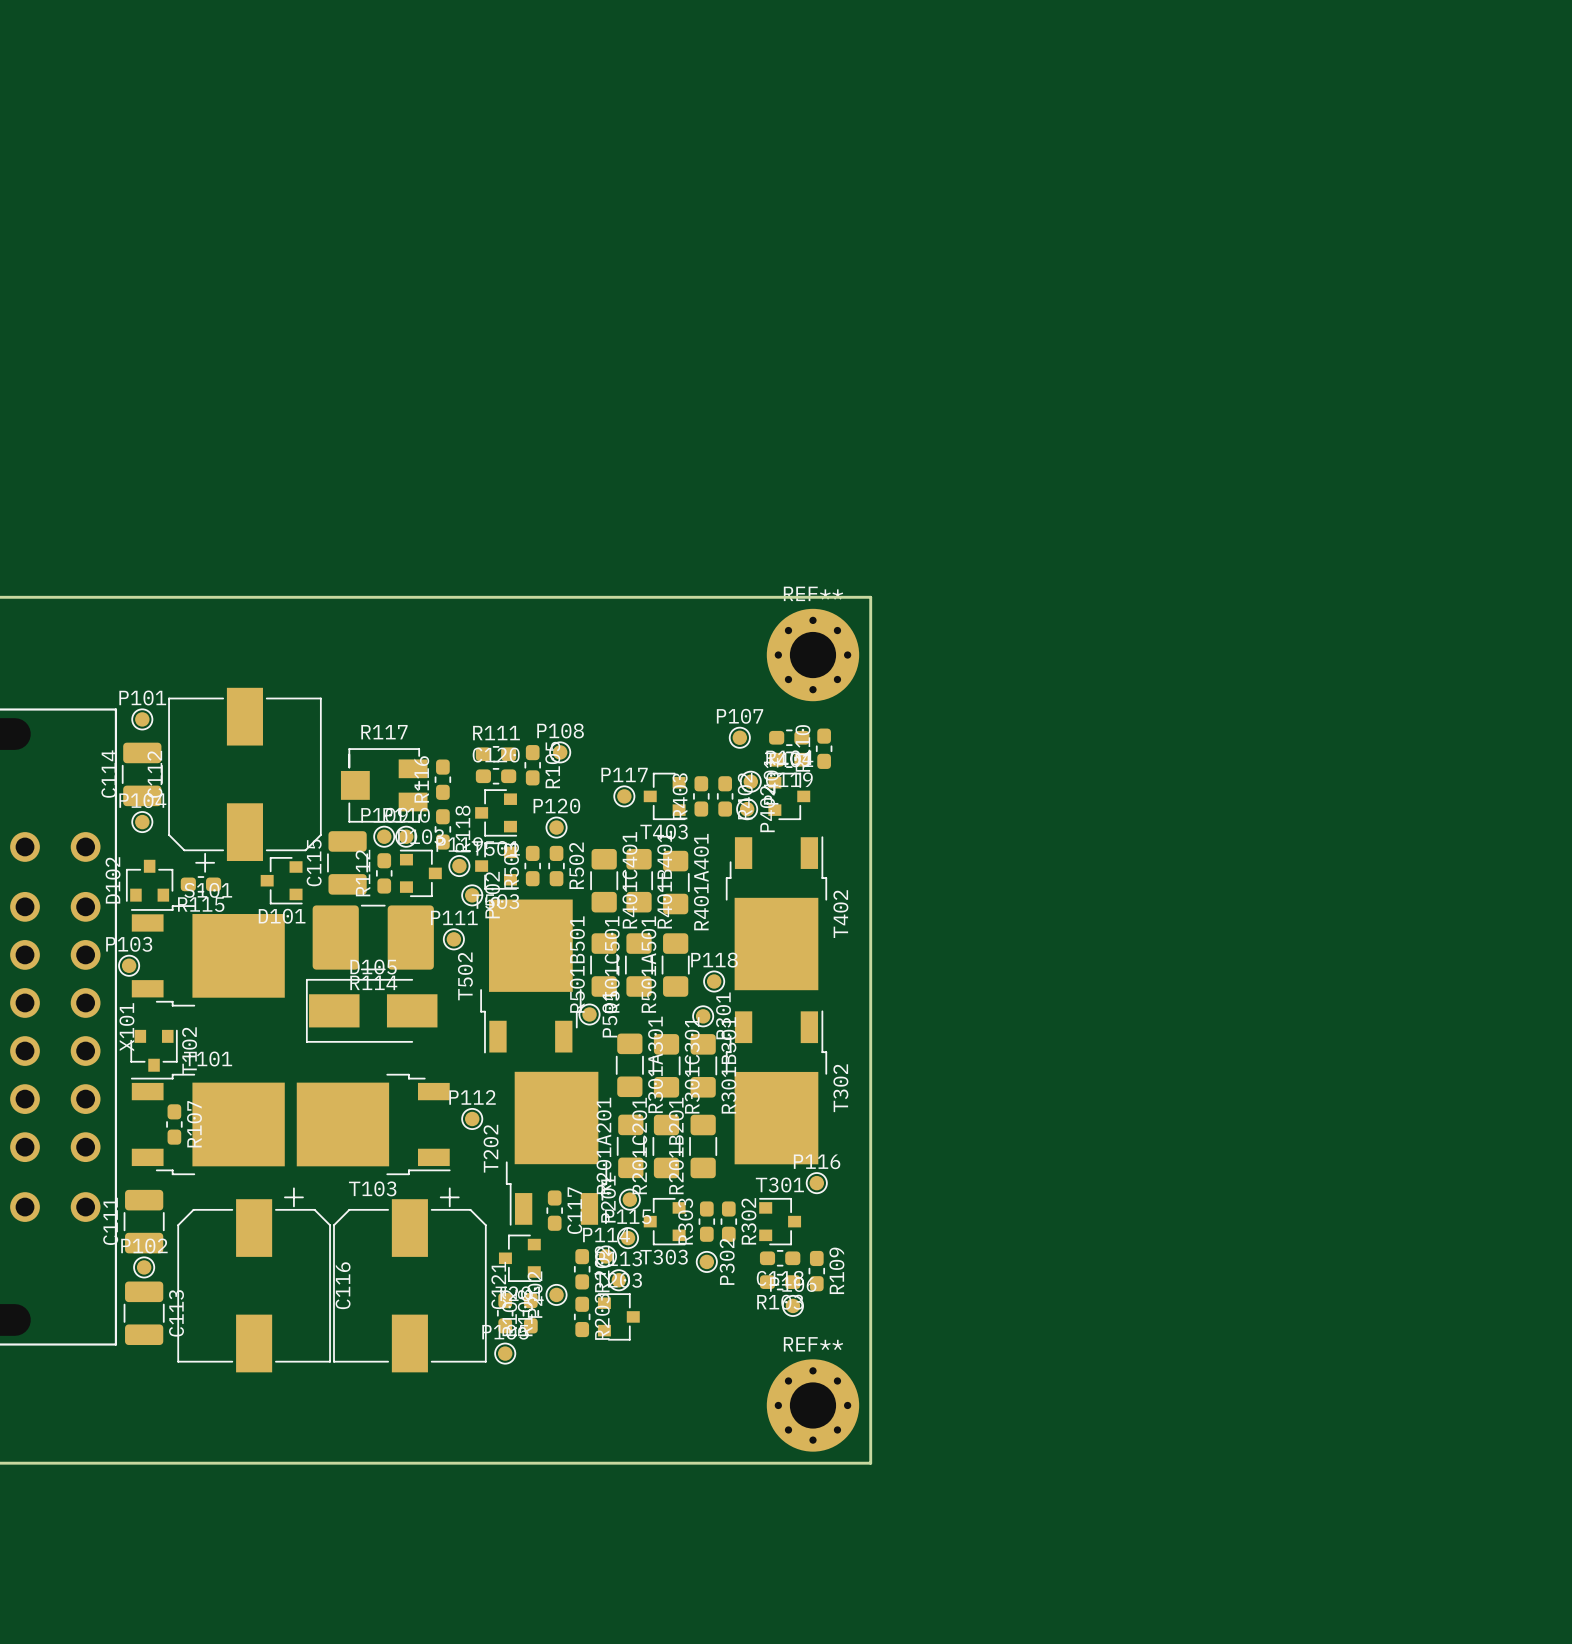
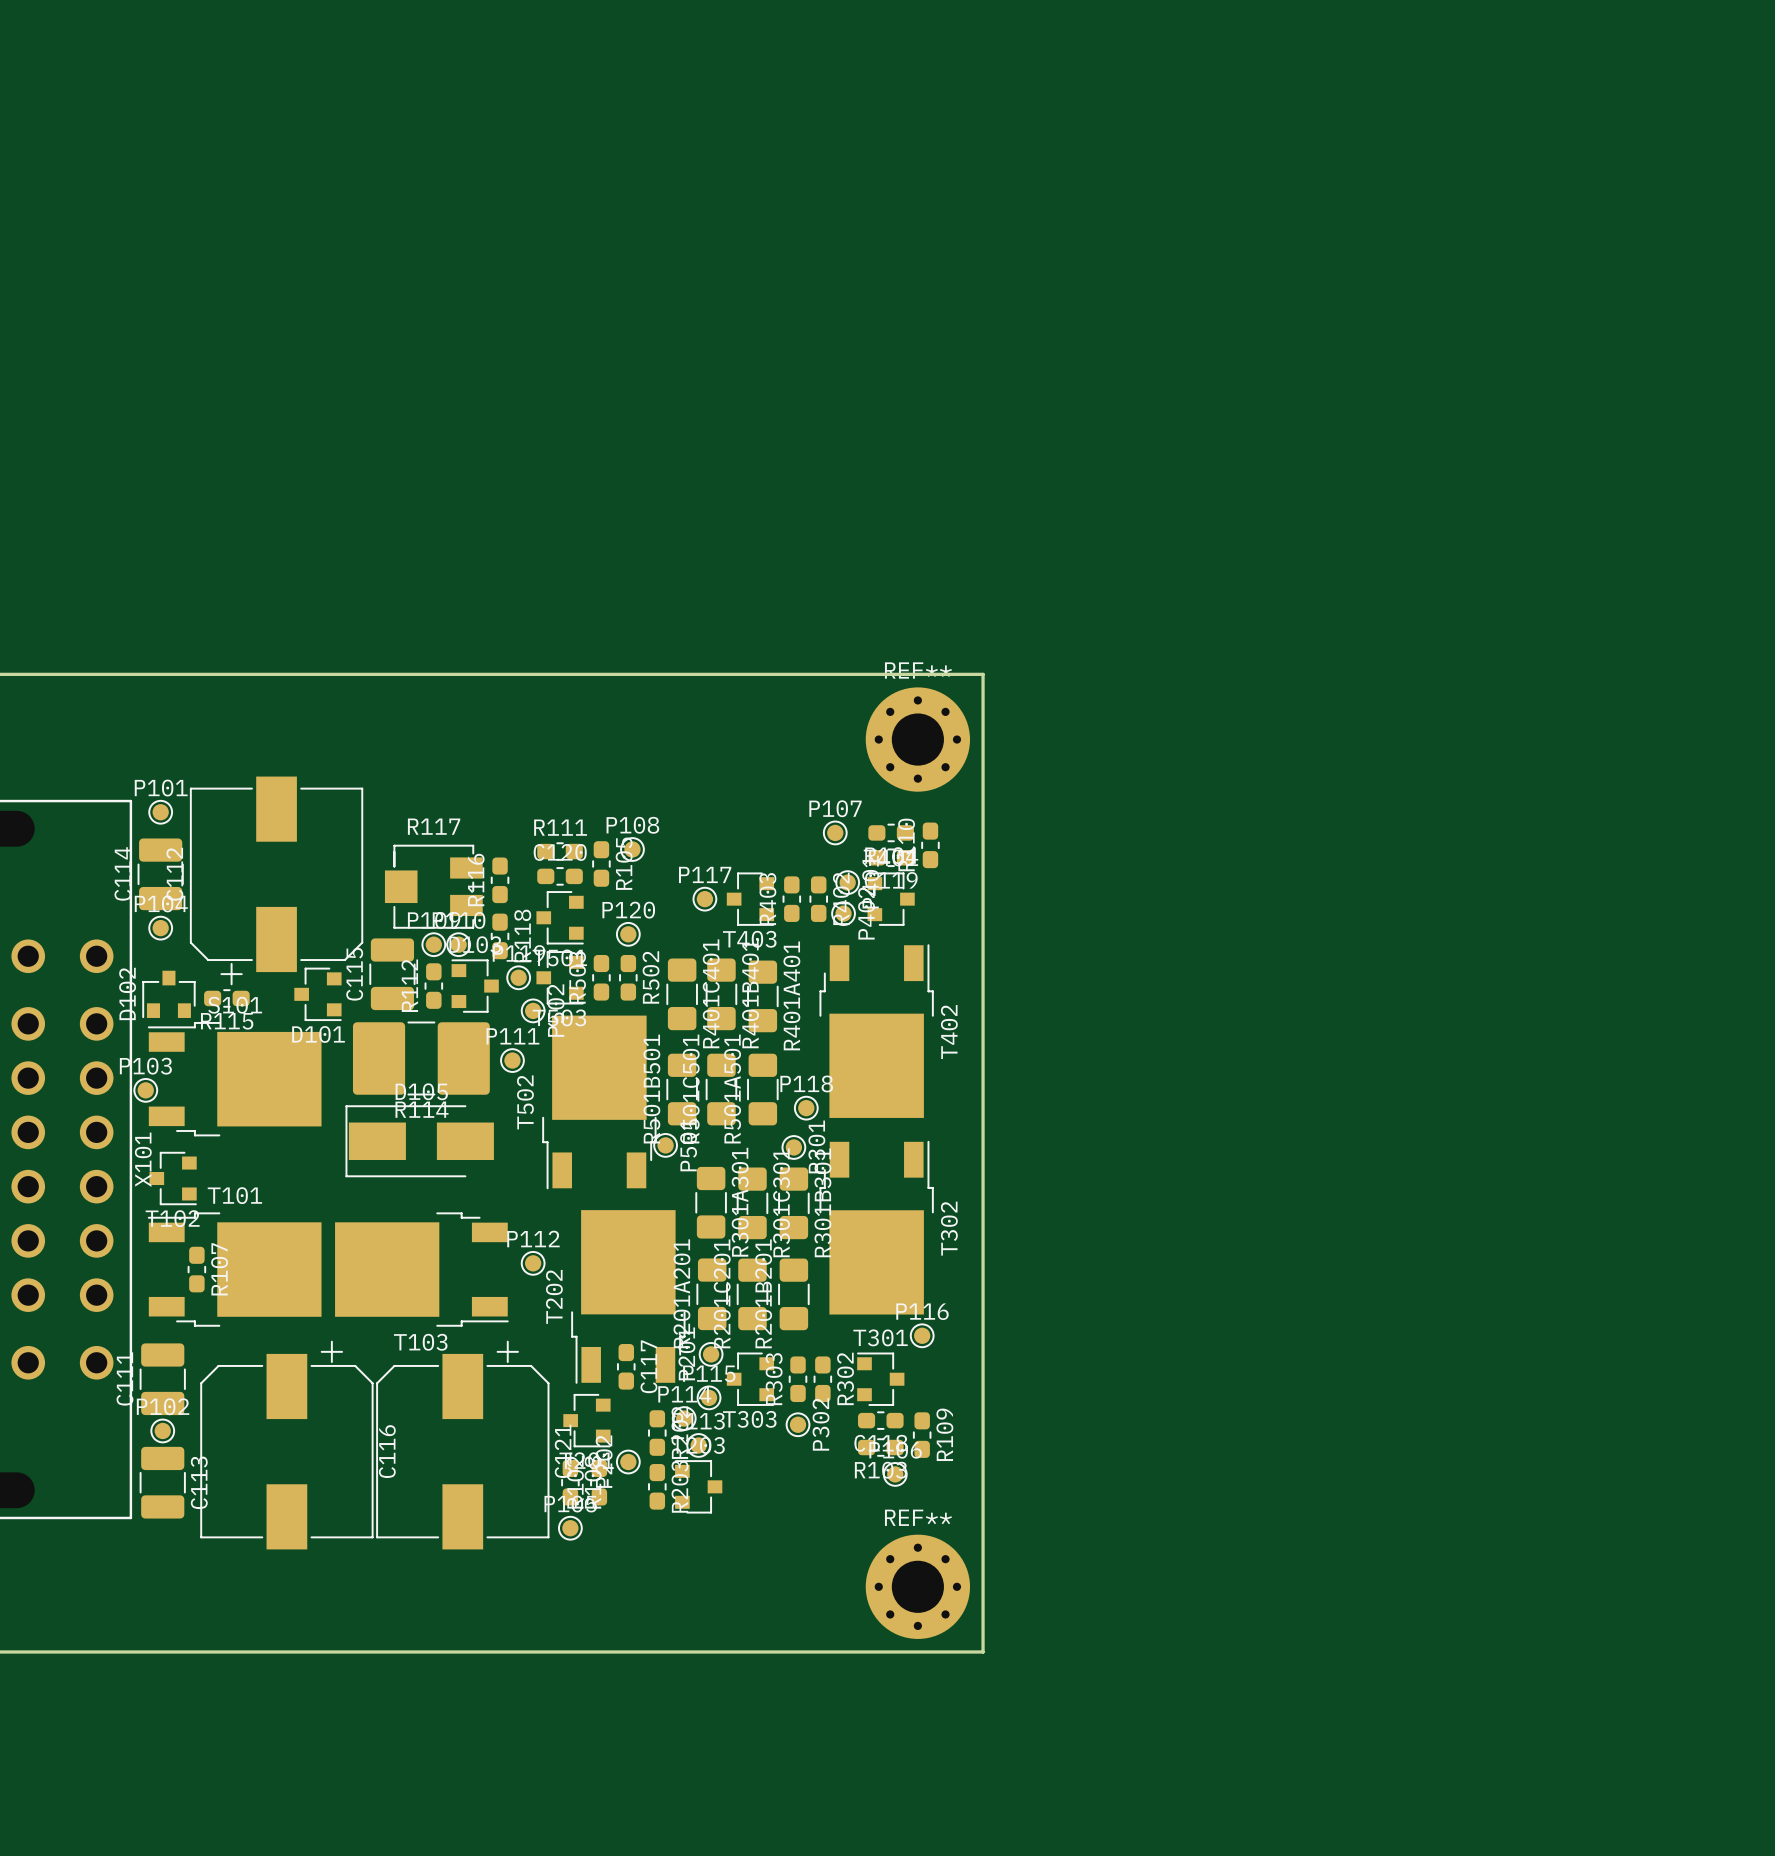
T102 rotation: 0° (154, 1050) -> 90° clockwise (173, 1178)

